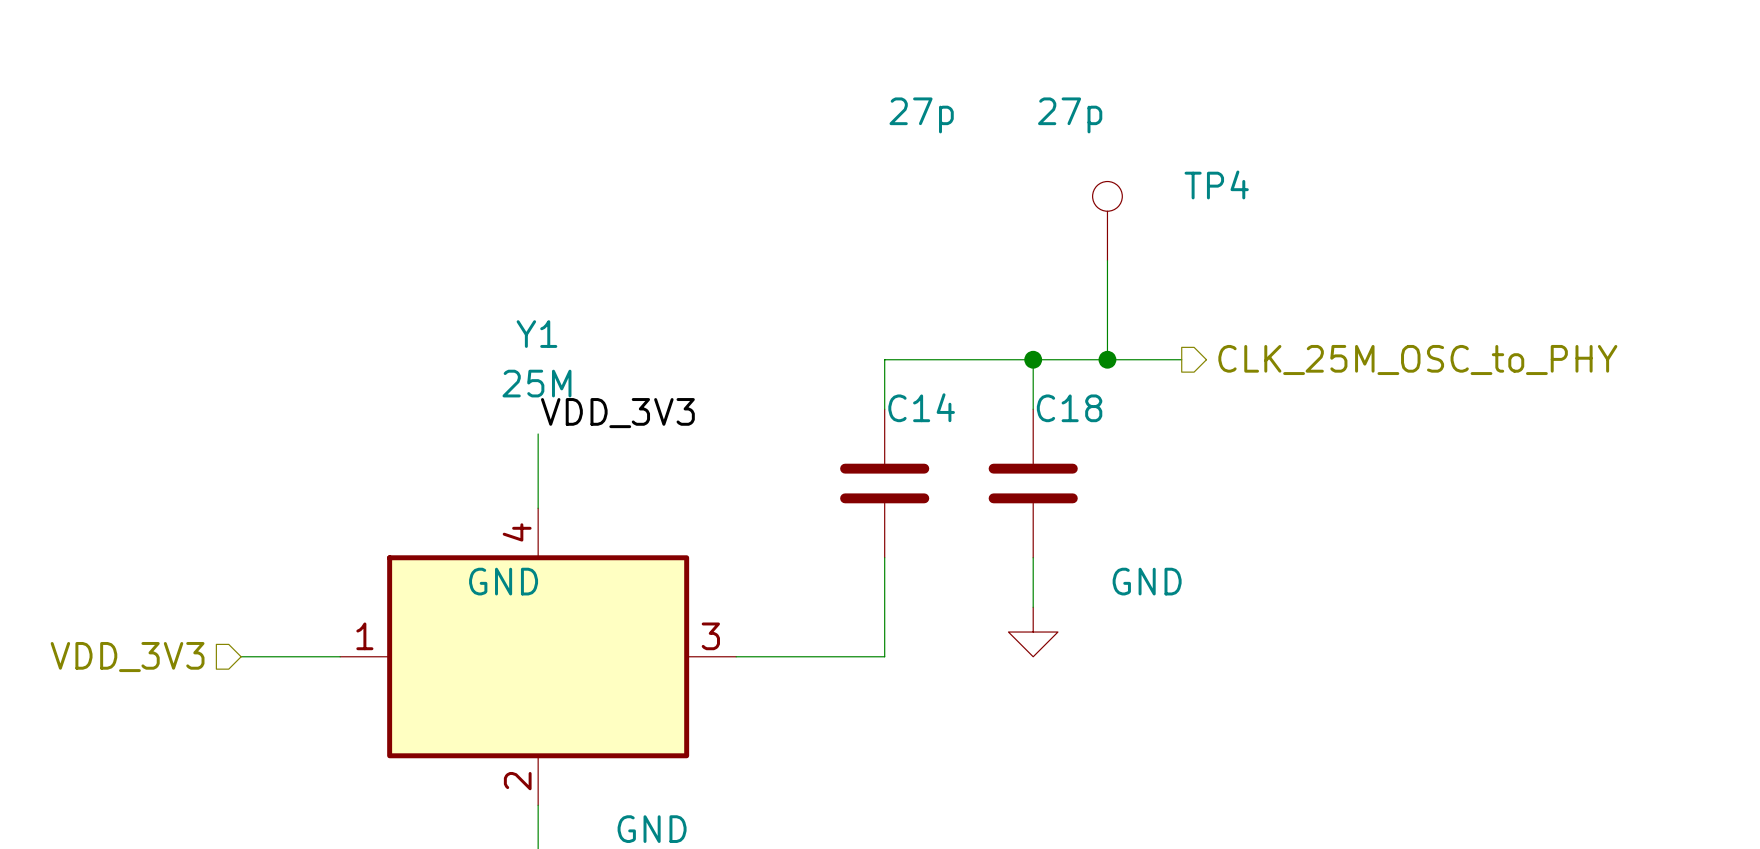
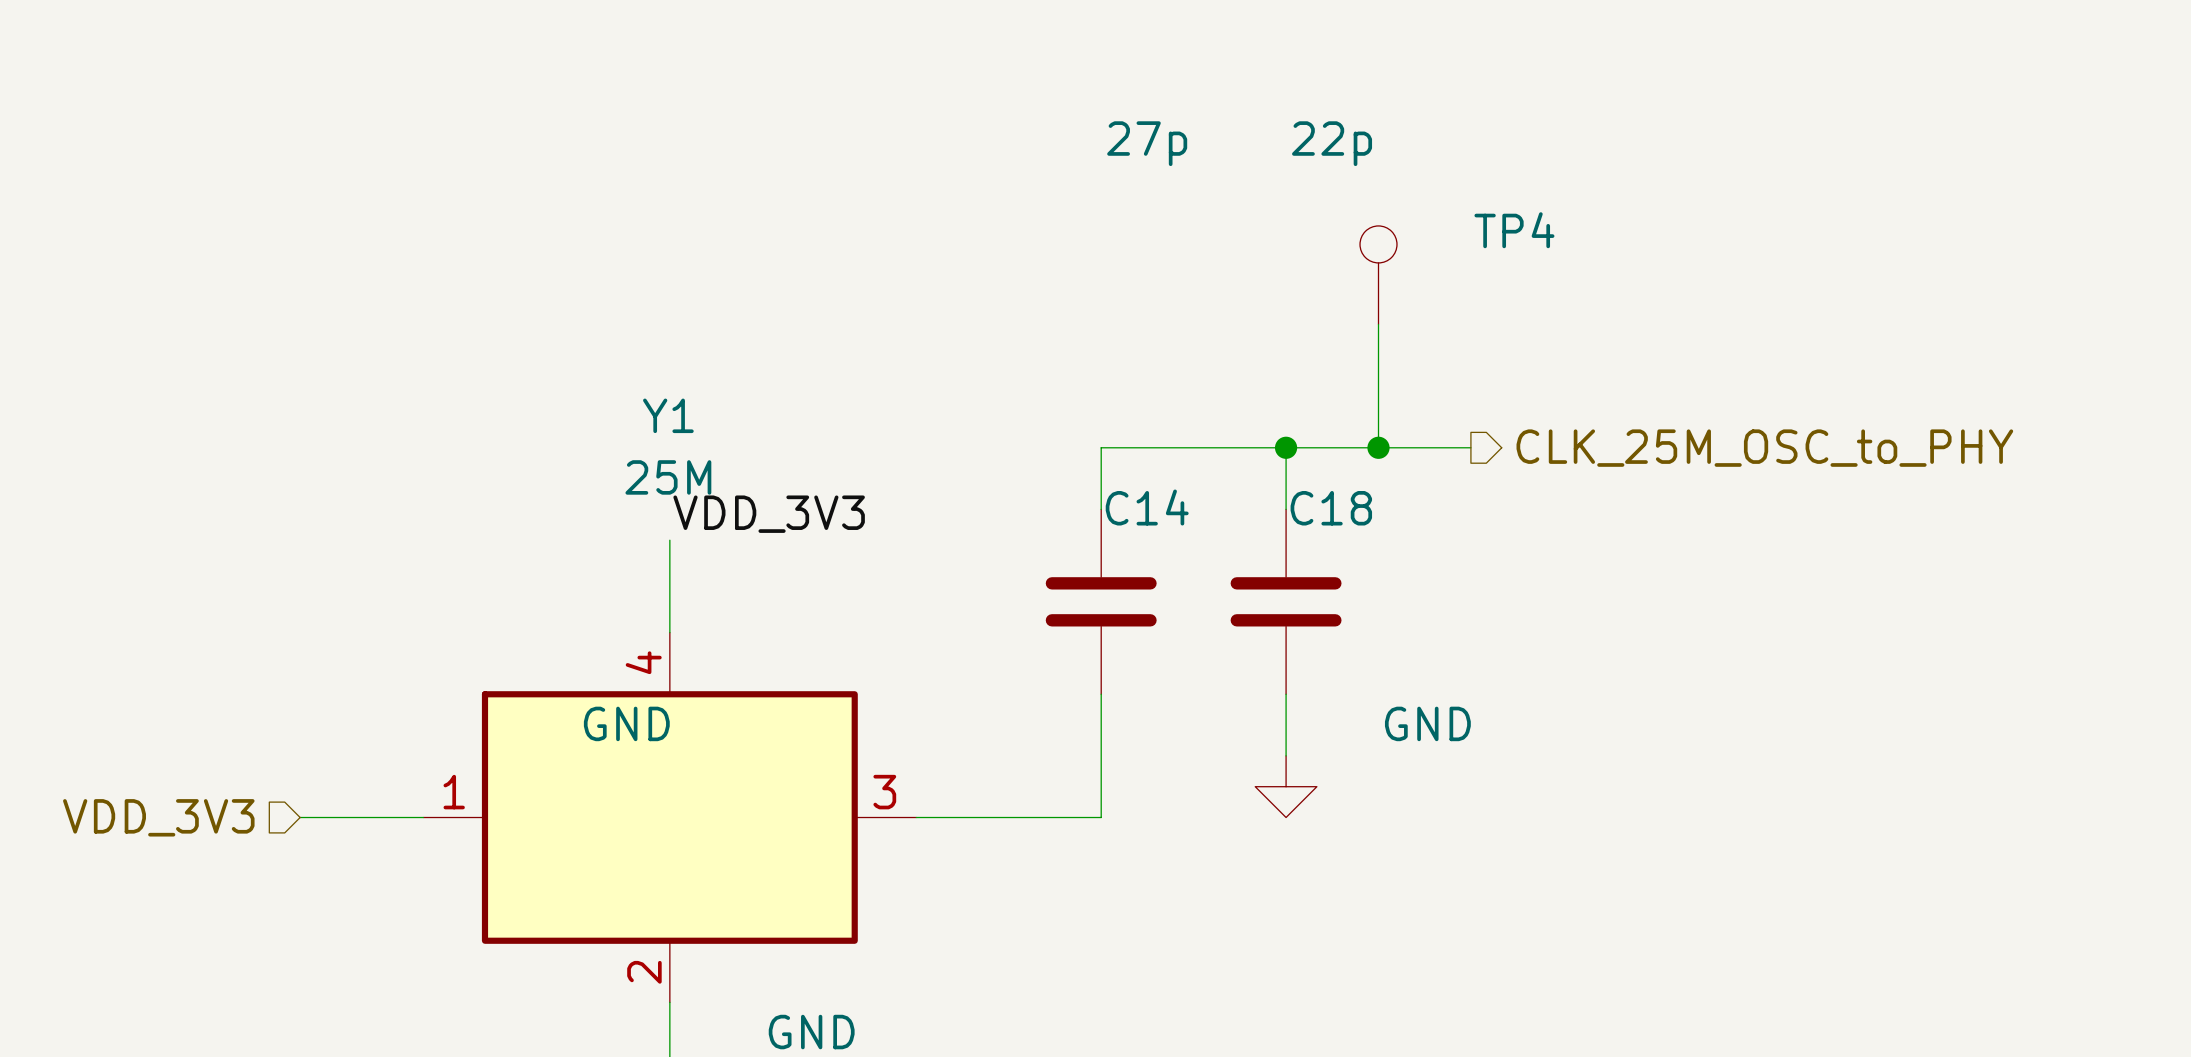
C18 value: 27p (1070, 115) -> 22p (1332, 143)

